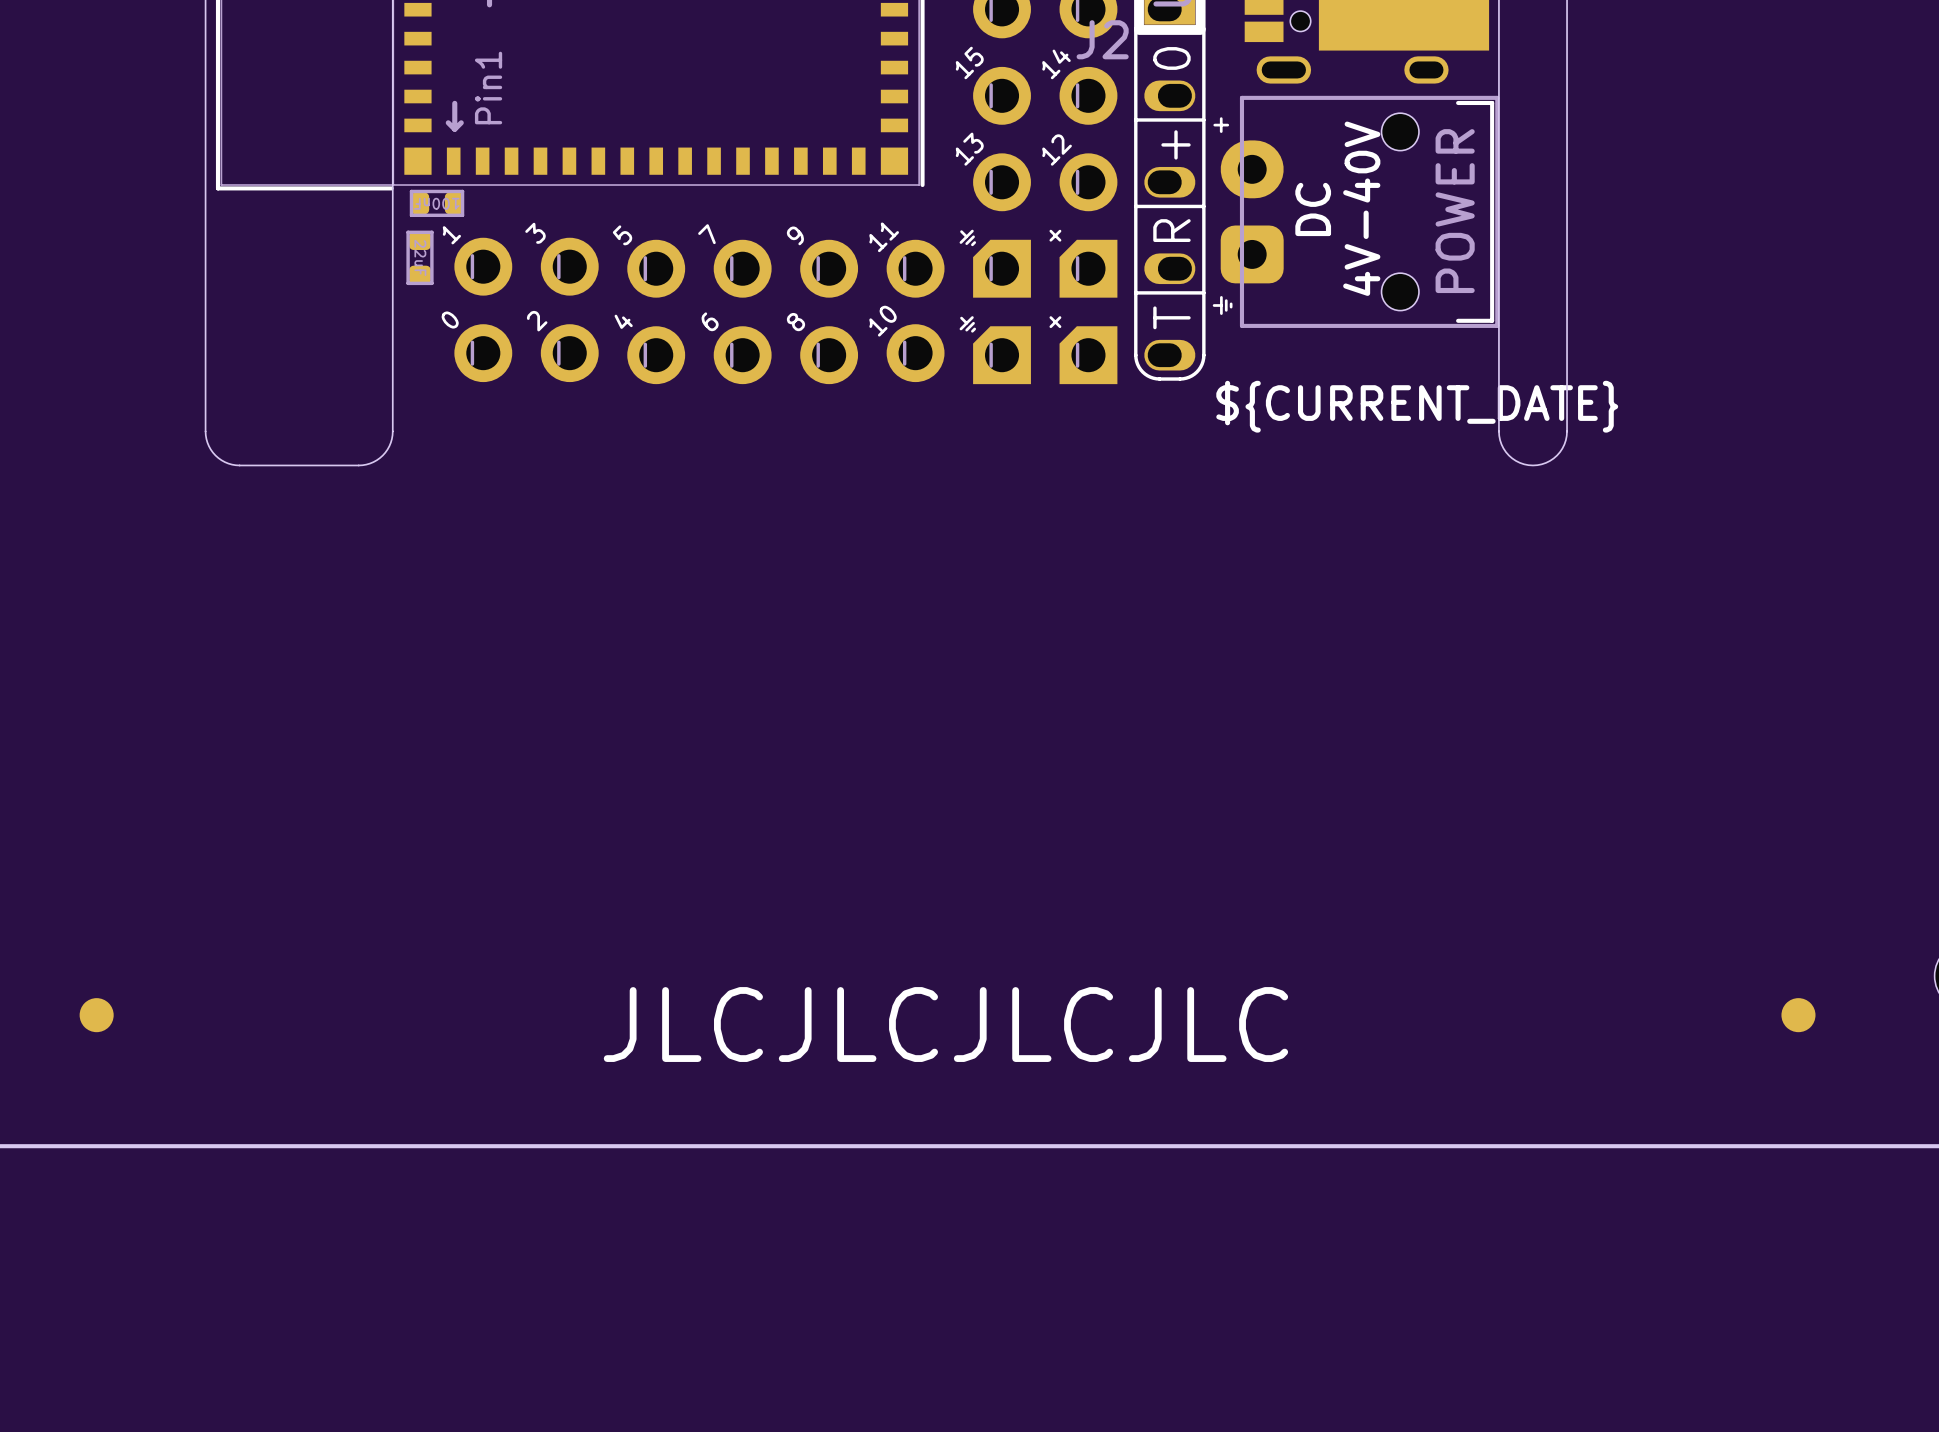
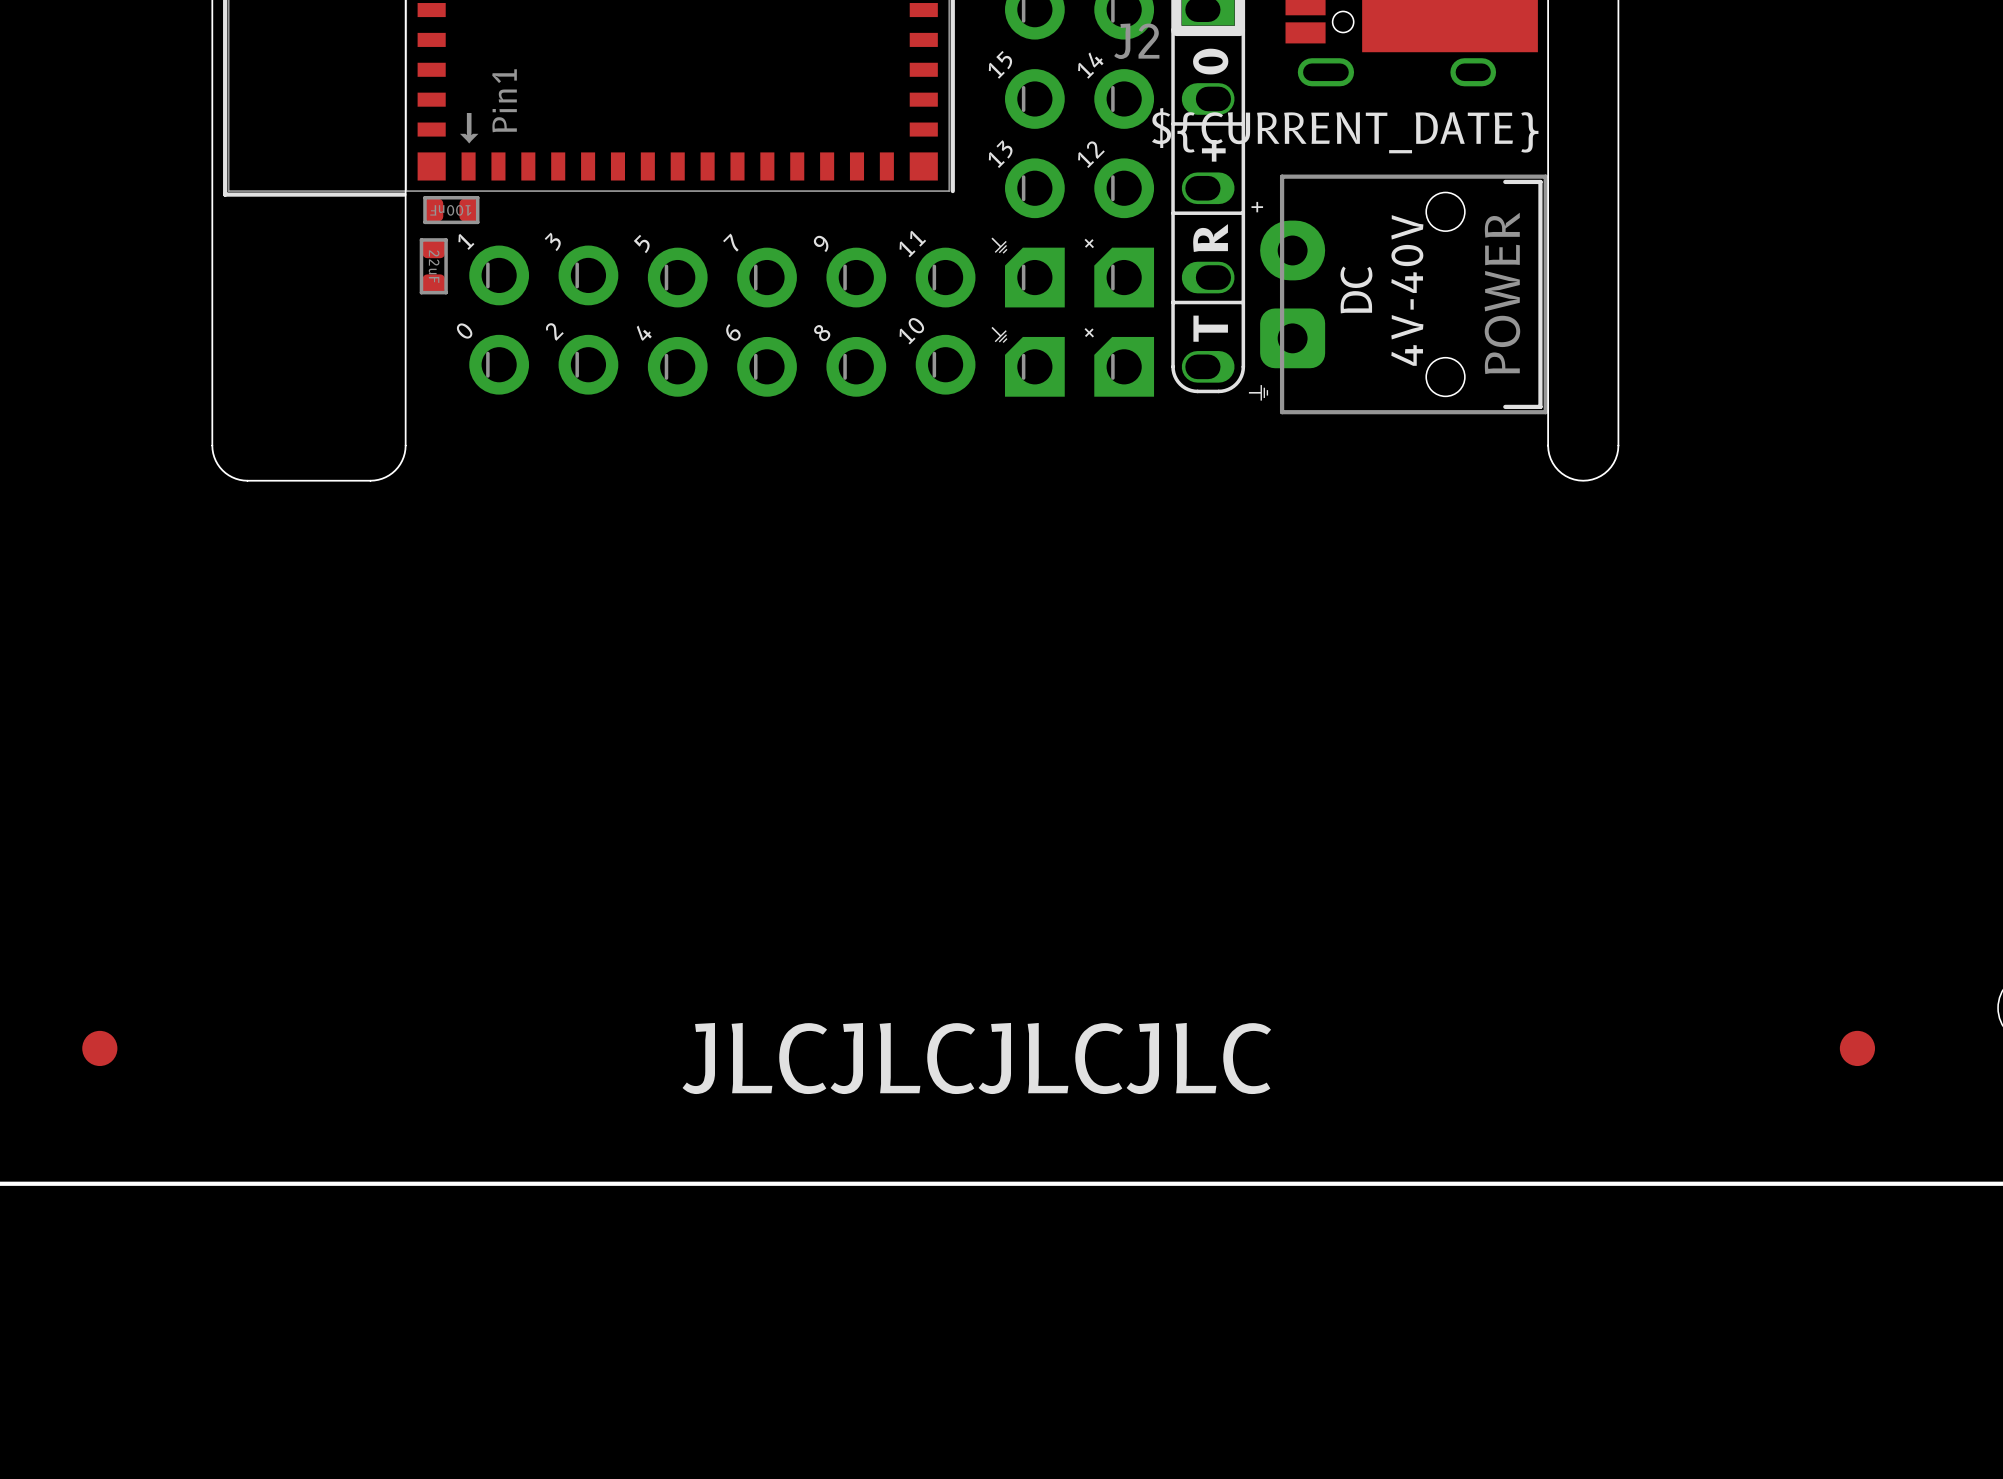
text position: + (1221, 125) -> + (1257, 207)
text: none -> ${CURRENT_DATE} (1345, 130)
text position: 4V-40V (1361, 208) -> 4V-40V (1407, 290)
text position: DC (1313, 209) -> DC (1356, 289)
part position: (1360, 211) -> (1403, 294)
text: ⏚ (1222, 305) -> none
text: ${CURRENT_DATE} (1417, 406) -> ⏚ (1258, 392)

